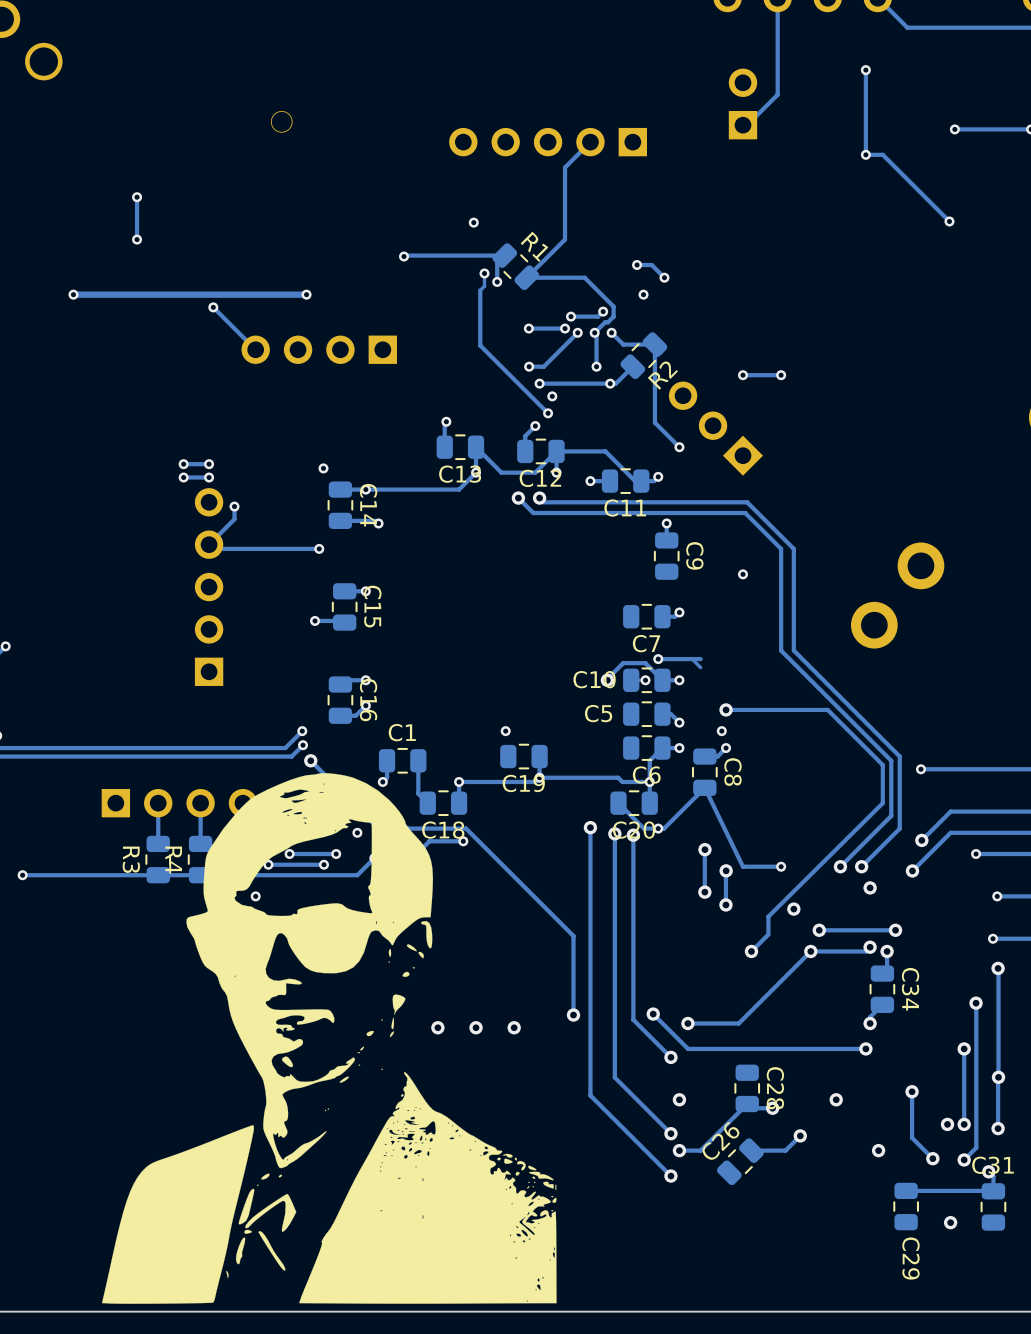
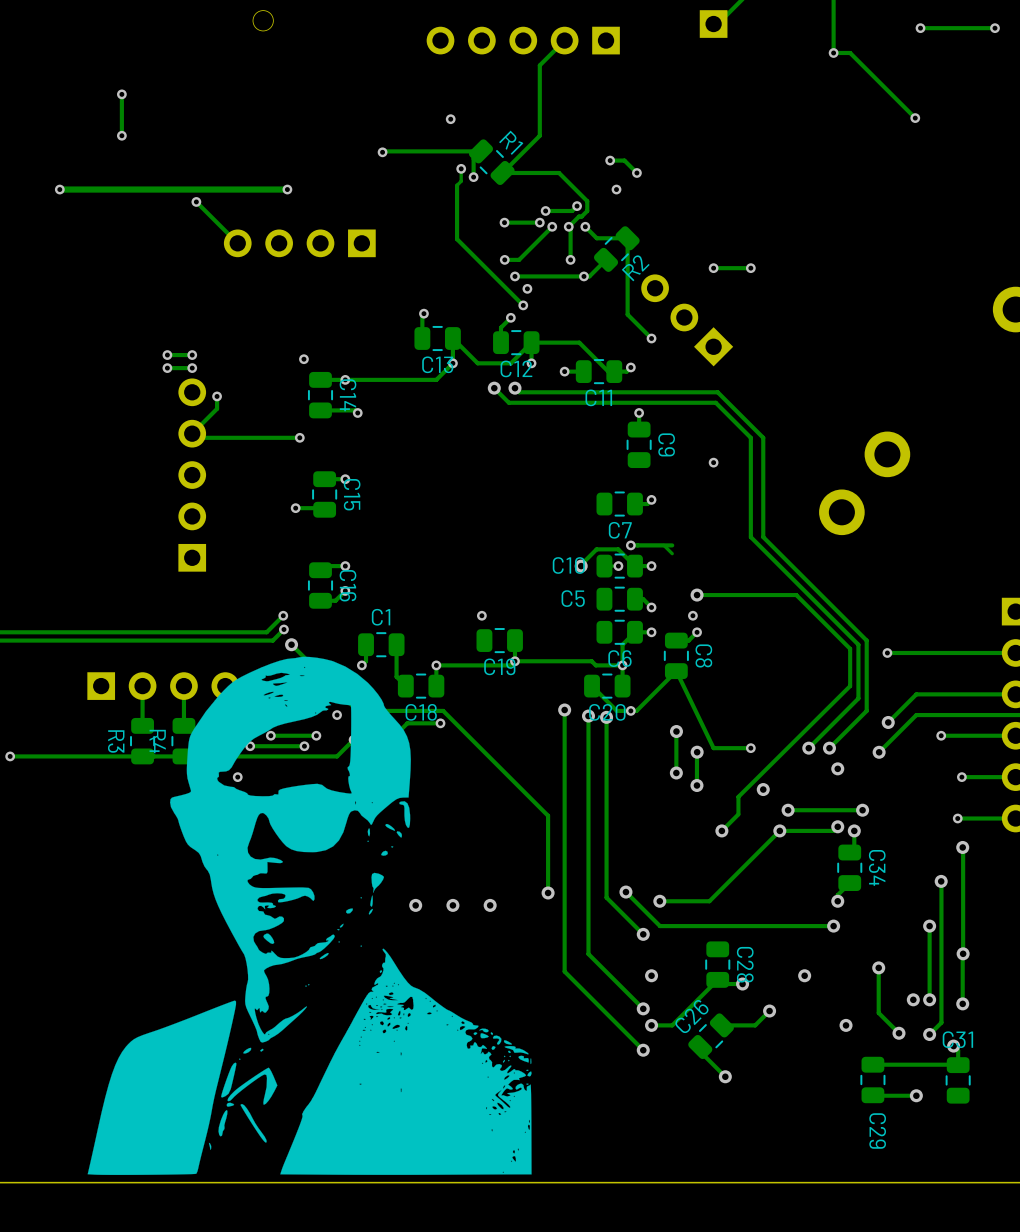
track: none -> (700, 1047) (700, 1051) (725, 1076)
via: none -> (725, 1076)
track: none -> (872, 1095) (916, 1095)

